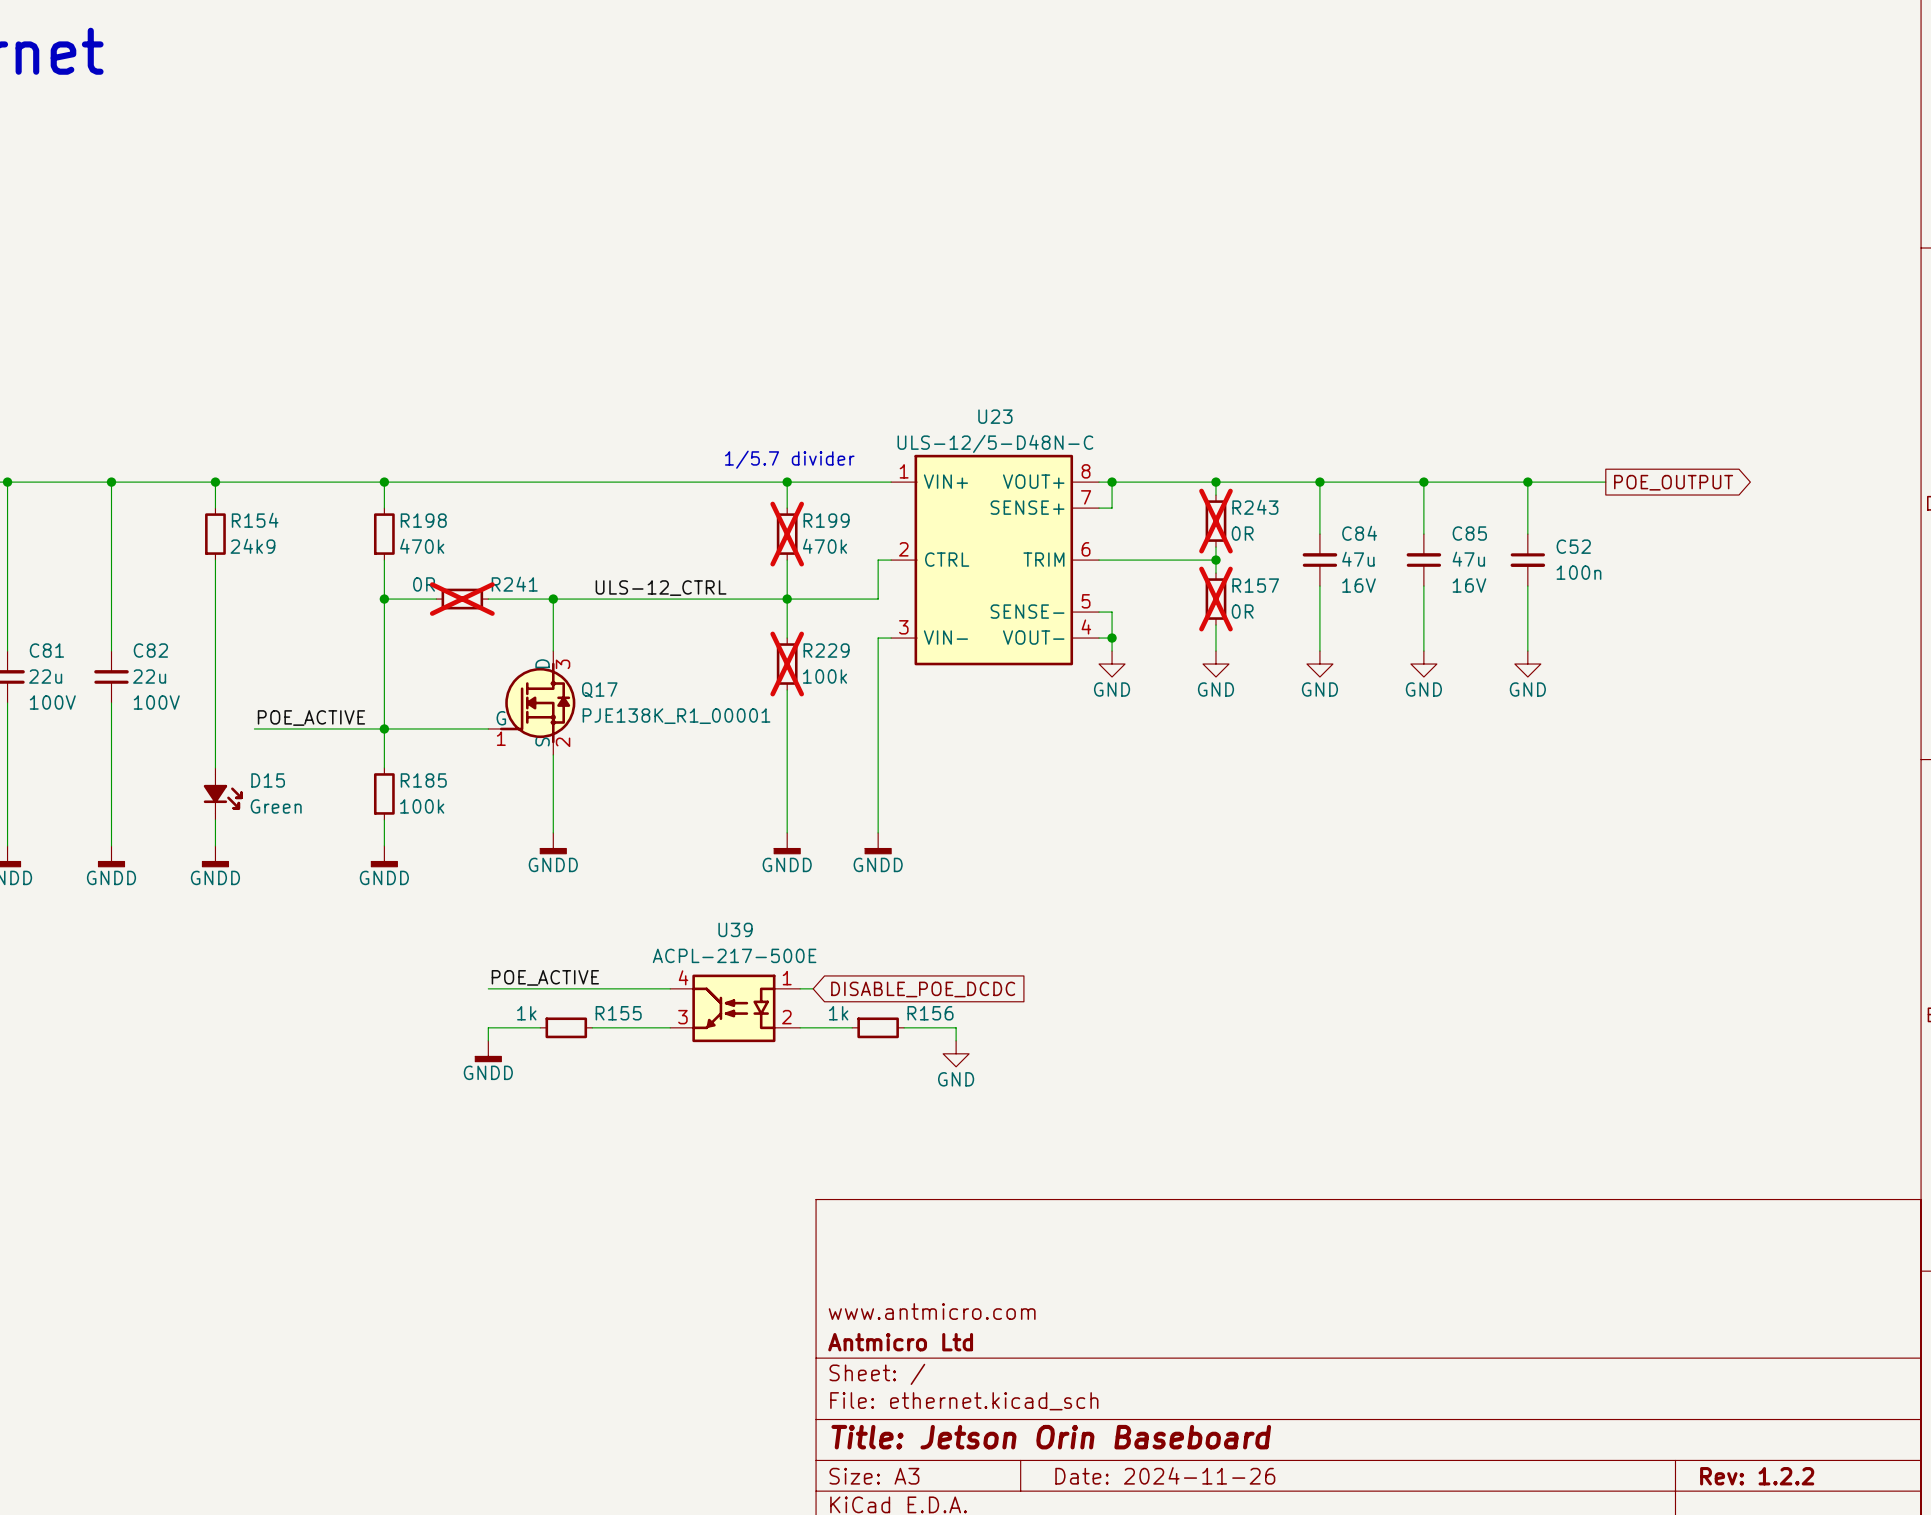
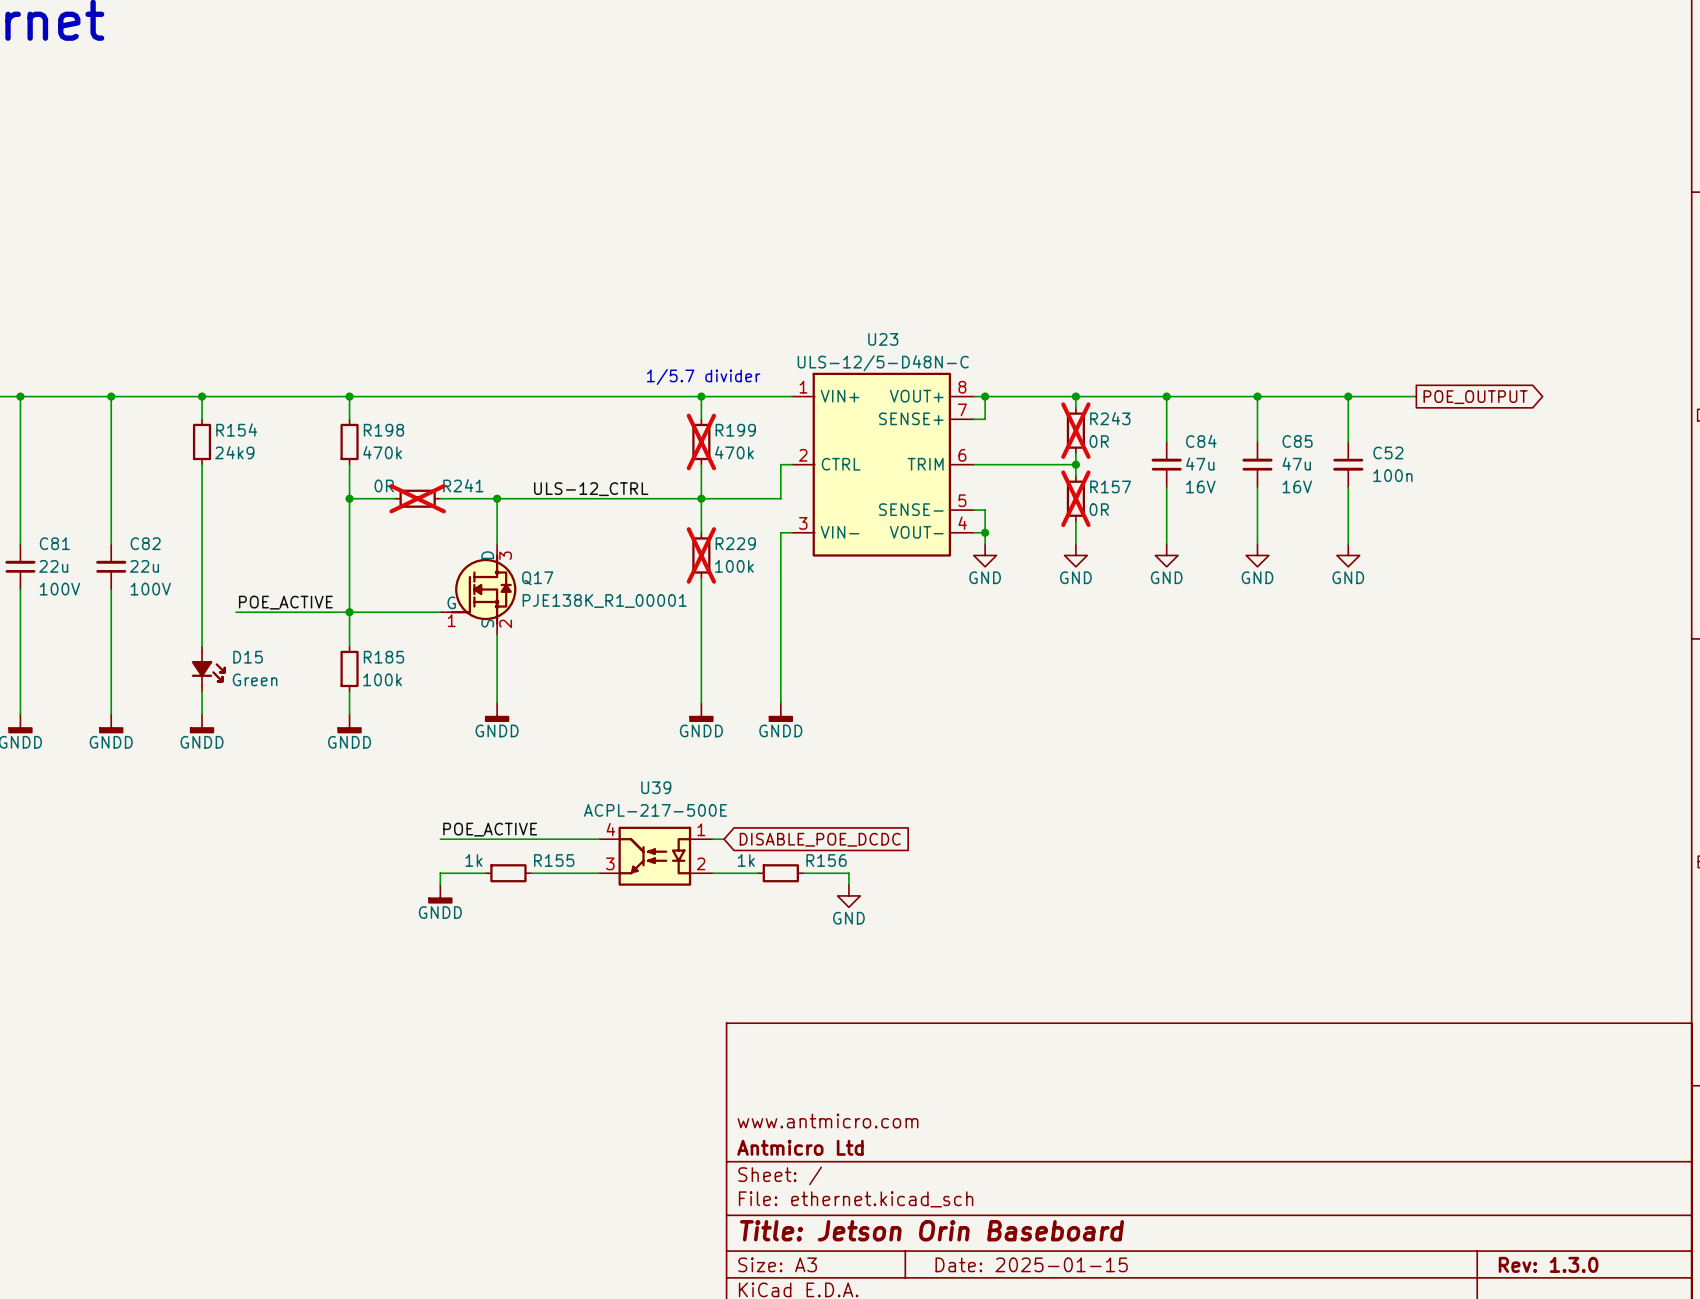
title block: Date: 2024-11-26 (1165, 1475) -> Date: 2025-01-15 (1031, 1264)
title block: Rev: 1.2.2 (1757, 1476) -> Rev: 1.3.0 (1548, 1264)

